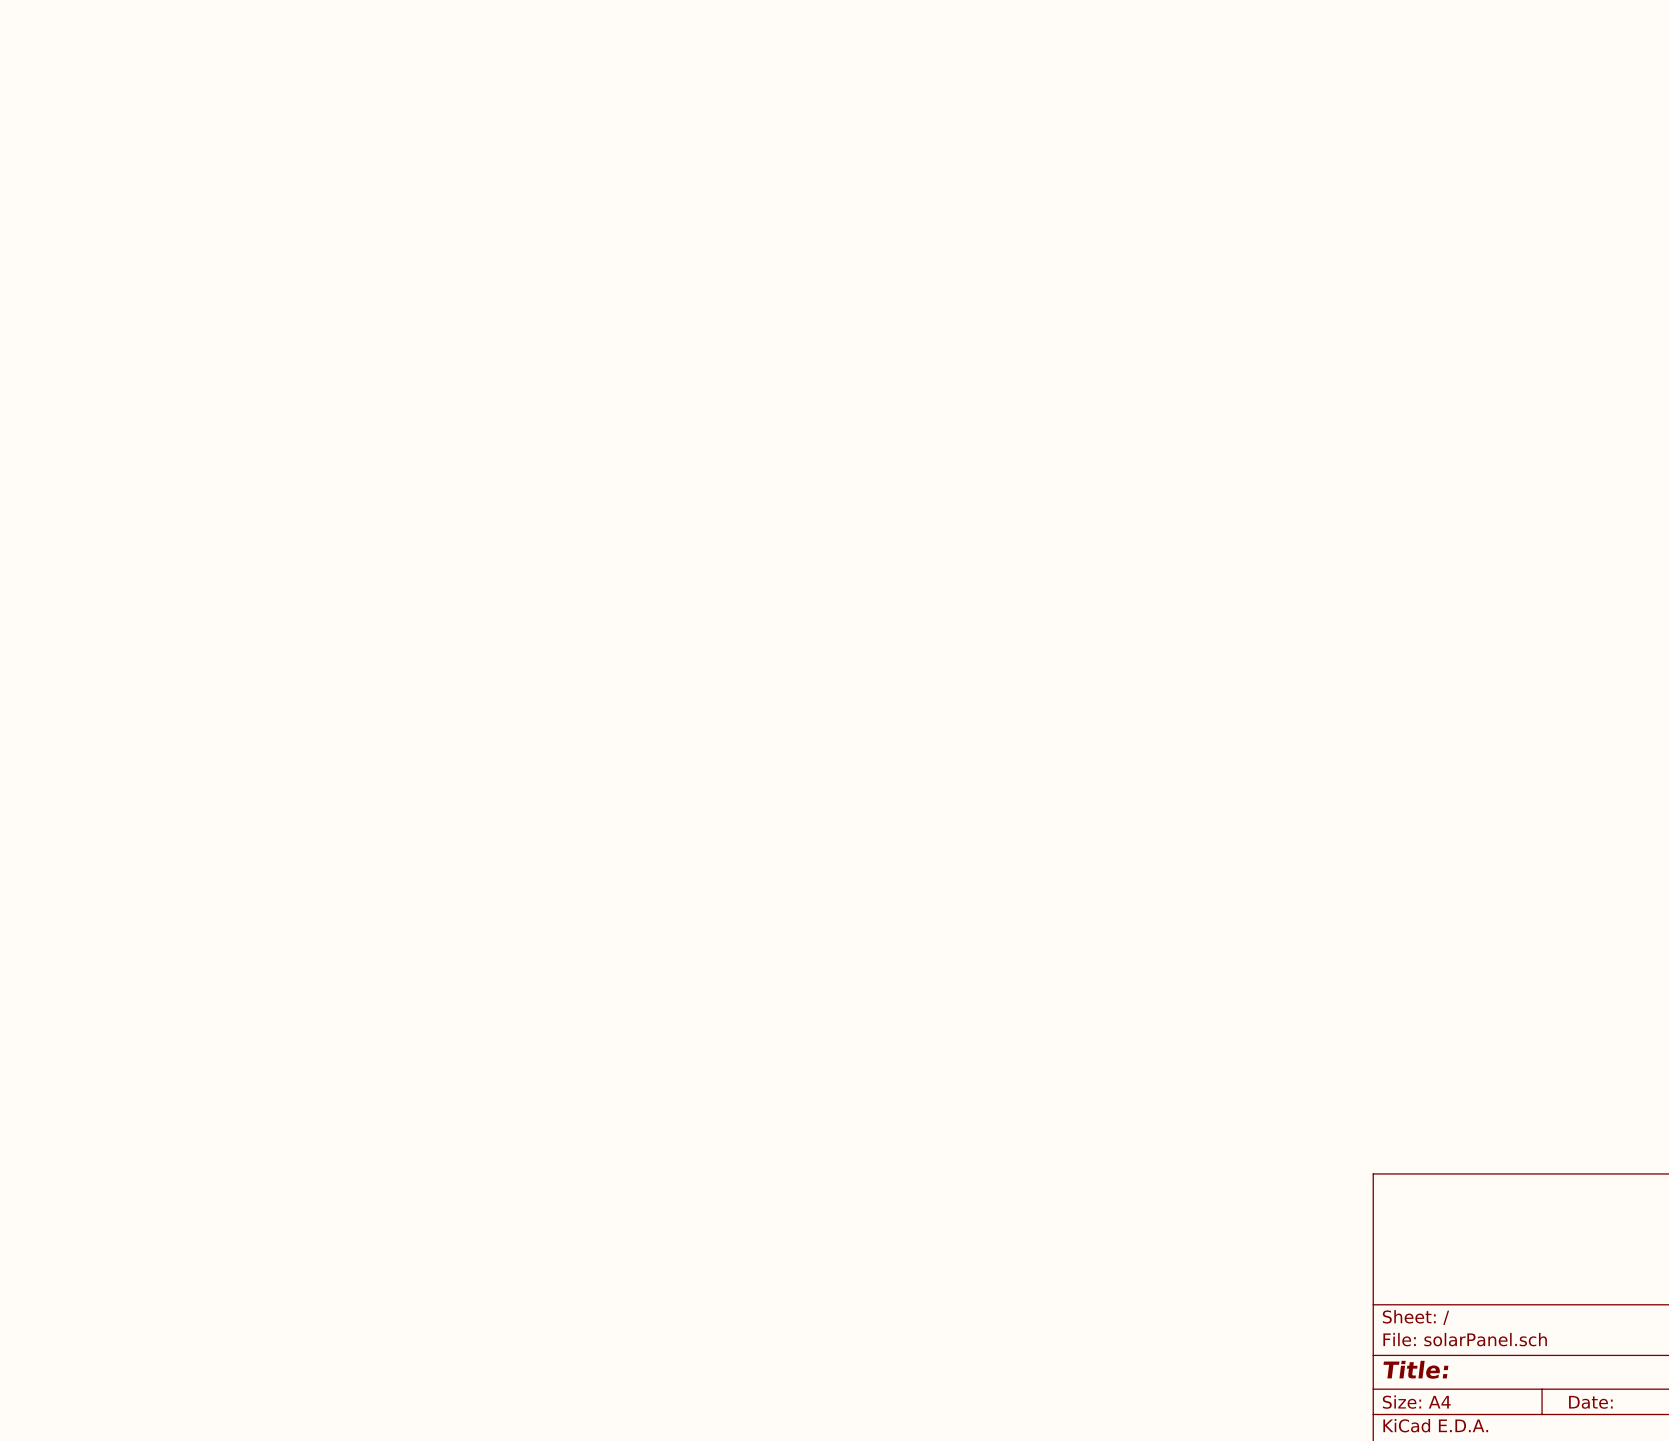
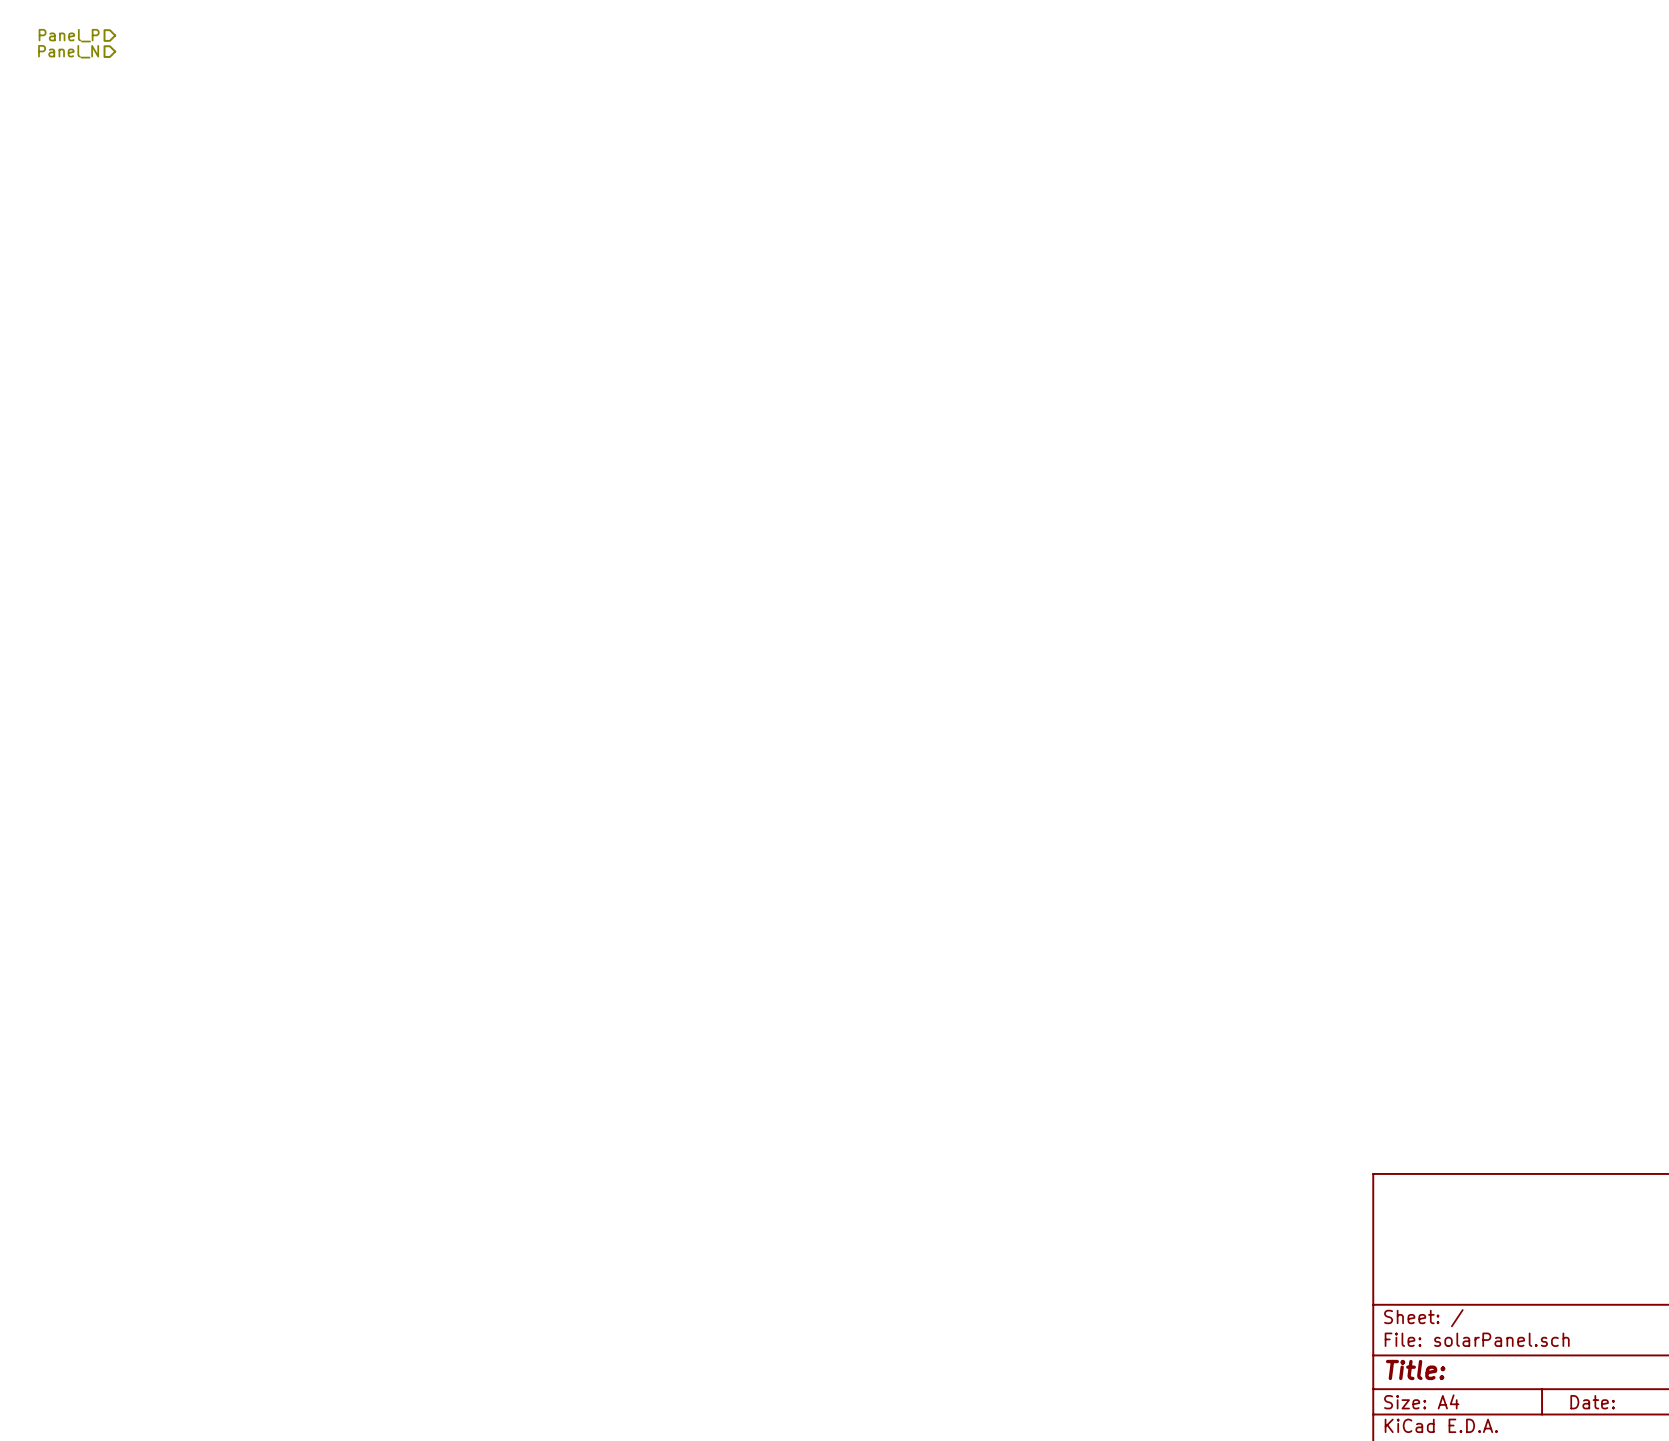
hierarchical label: none -> Panel_P (69, 35)
hierarchical label: none -> Panel_N (68, 51)

